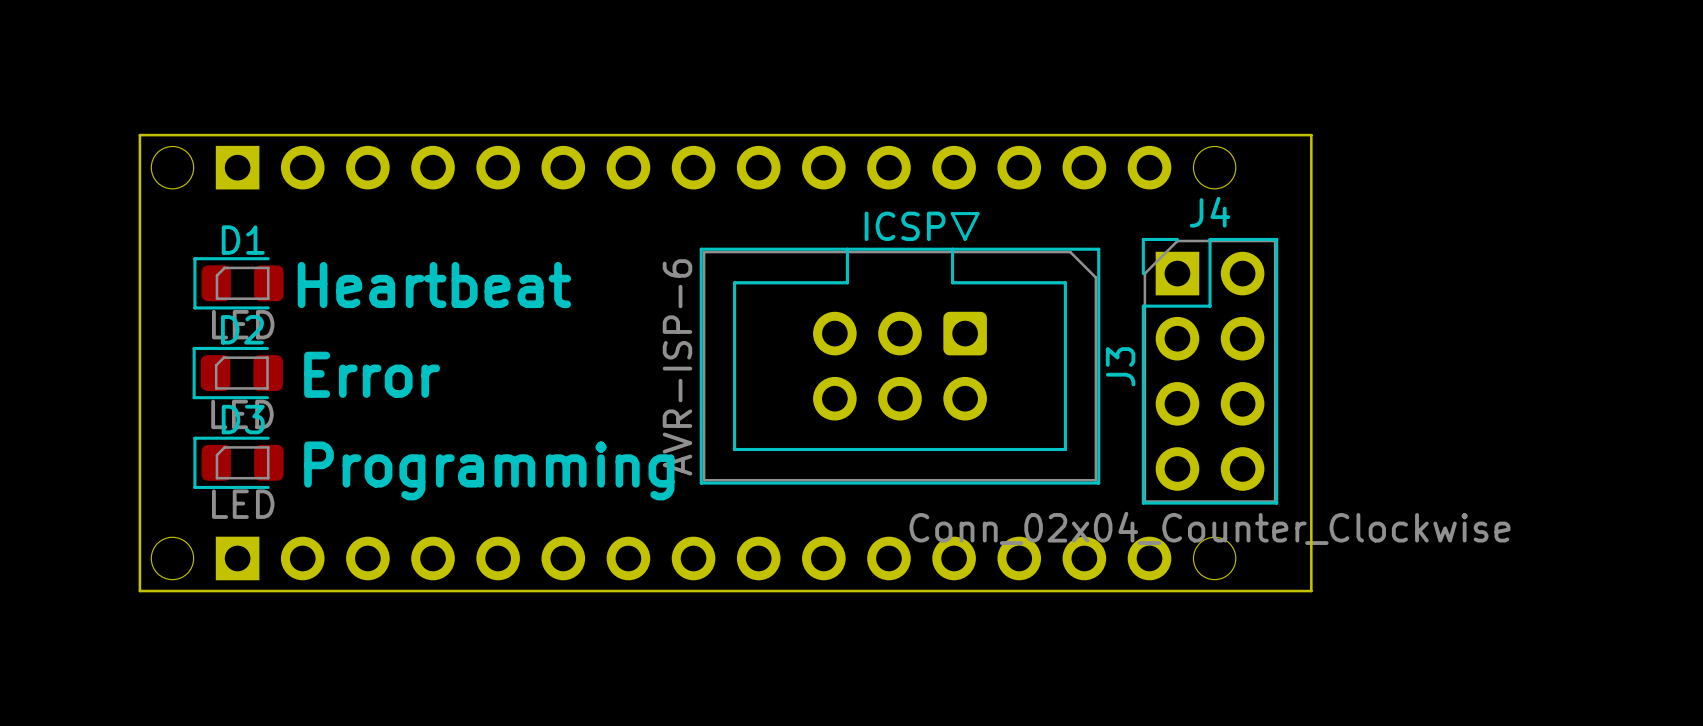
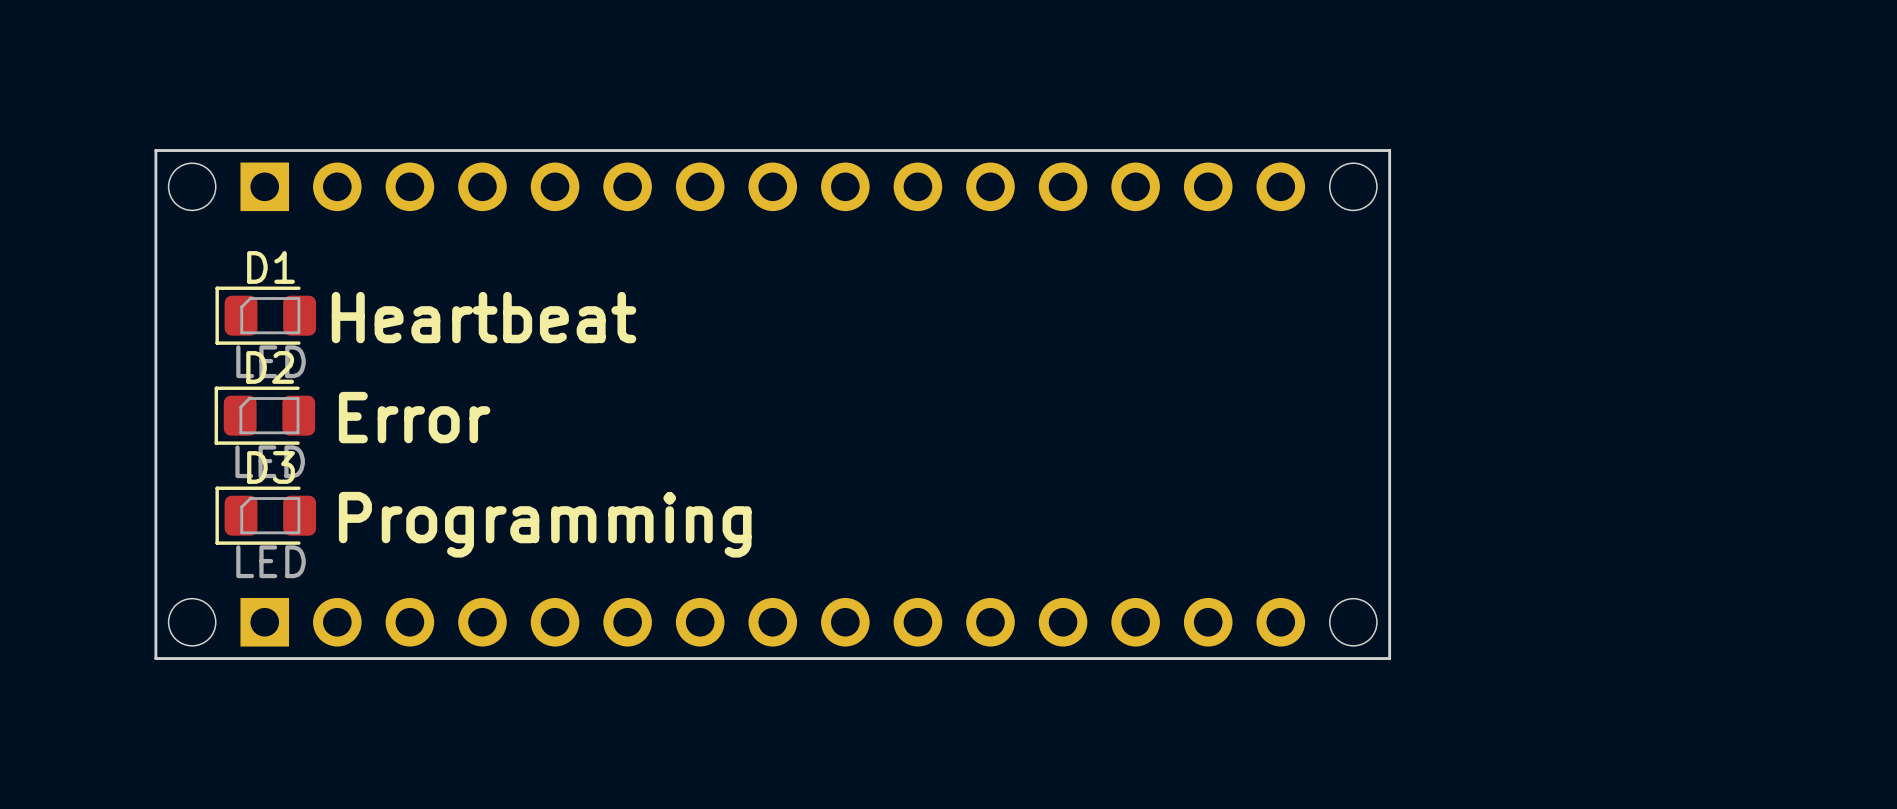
board edge: (1247, 135) (1311, 135) (1311, 591) (1247, 591) -> (1389, 150) (1389, 658)
text: ICSP (905, 226) -> none
J3: AVR-ISP-6 (899, 348) -> none
J4: Conn_02x04_Counter_Clockwise (1210, 371) -> none

